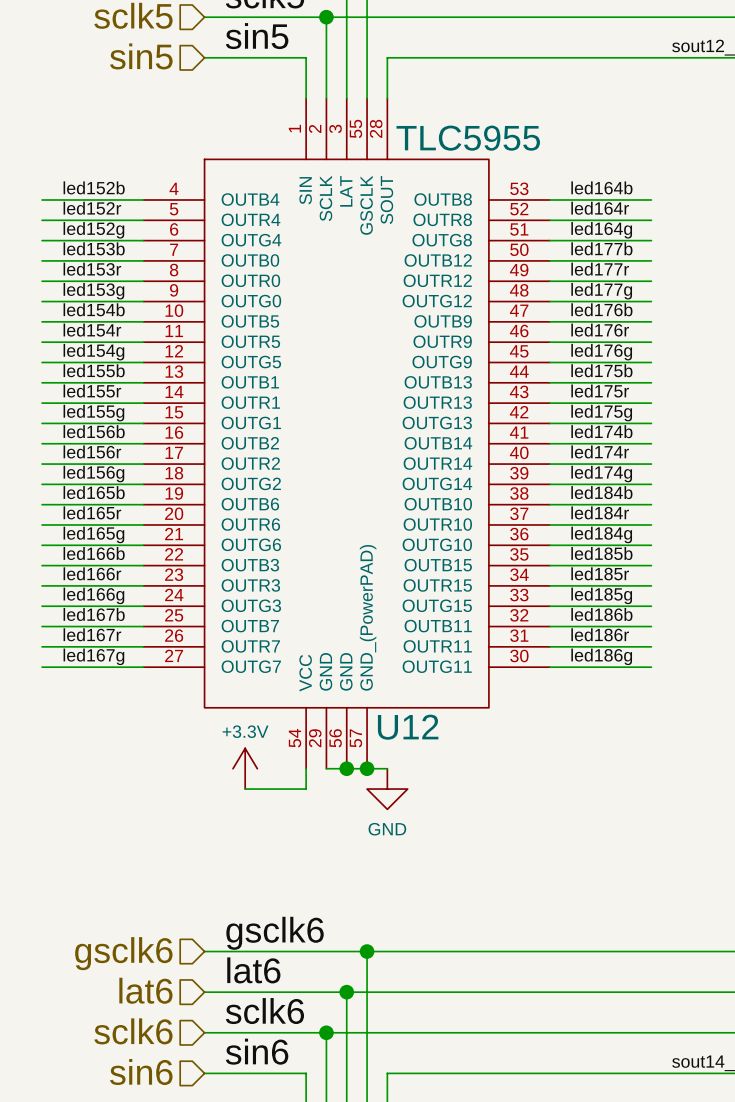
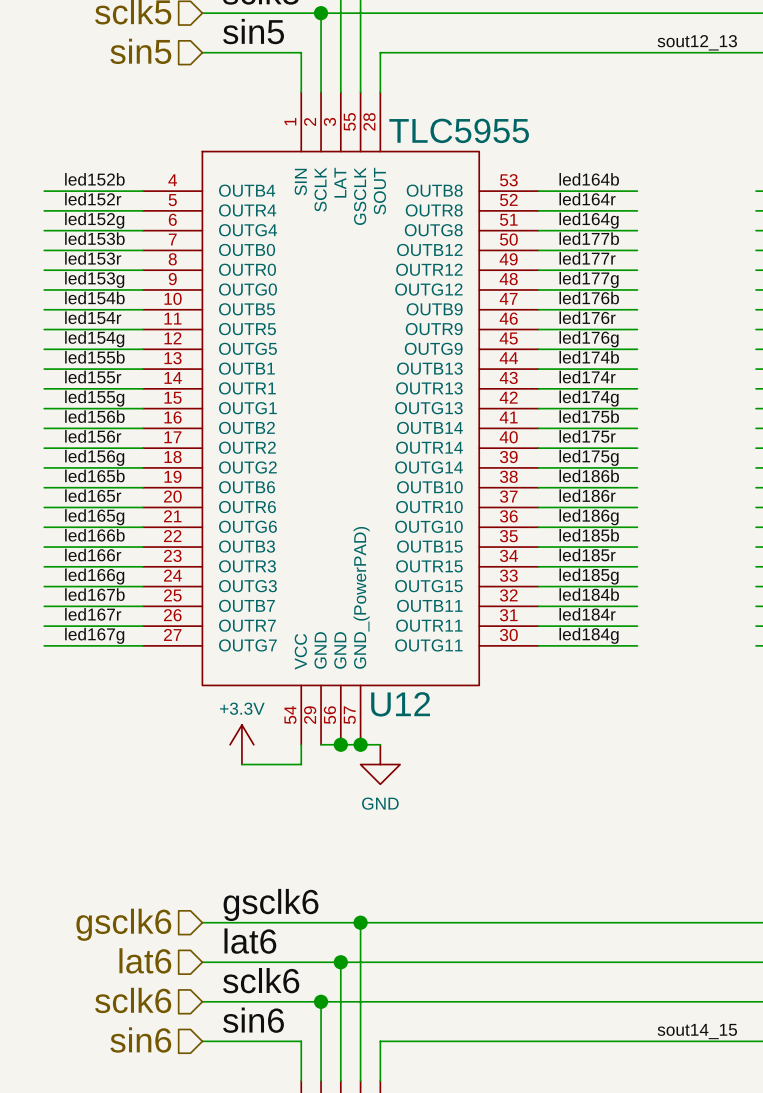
label: led175b (601, 370) -> led174b (589, 357)
label: led175r (600, 391) -> led174r (587, 377)
label: led175g (601, 413) -> led174g (589, 398)
label: led174b (601, 431) -> led175b (589, 416)
label: led174r (600, 451) -> led175r (587, 436)
label: led174g (601, 474) -> led175g (589, 457)
label: led184b (601, 492) -> led186b (589, 475)
label: led184r (600, 512) -> led186r (587, 495)
label: led184g (601, 534) -> led186g (589, 517)
label: led186b (601, 614) -> led184b (589, 594)
label: led186r (600, 634) -> led184r (587, 614)
label: led186g (601, 656) -> led184g (589, 635)

